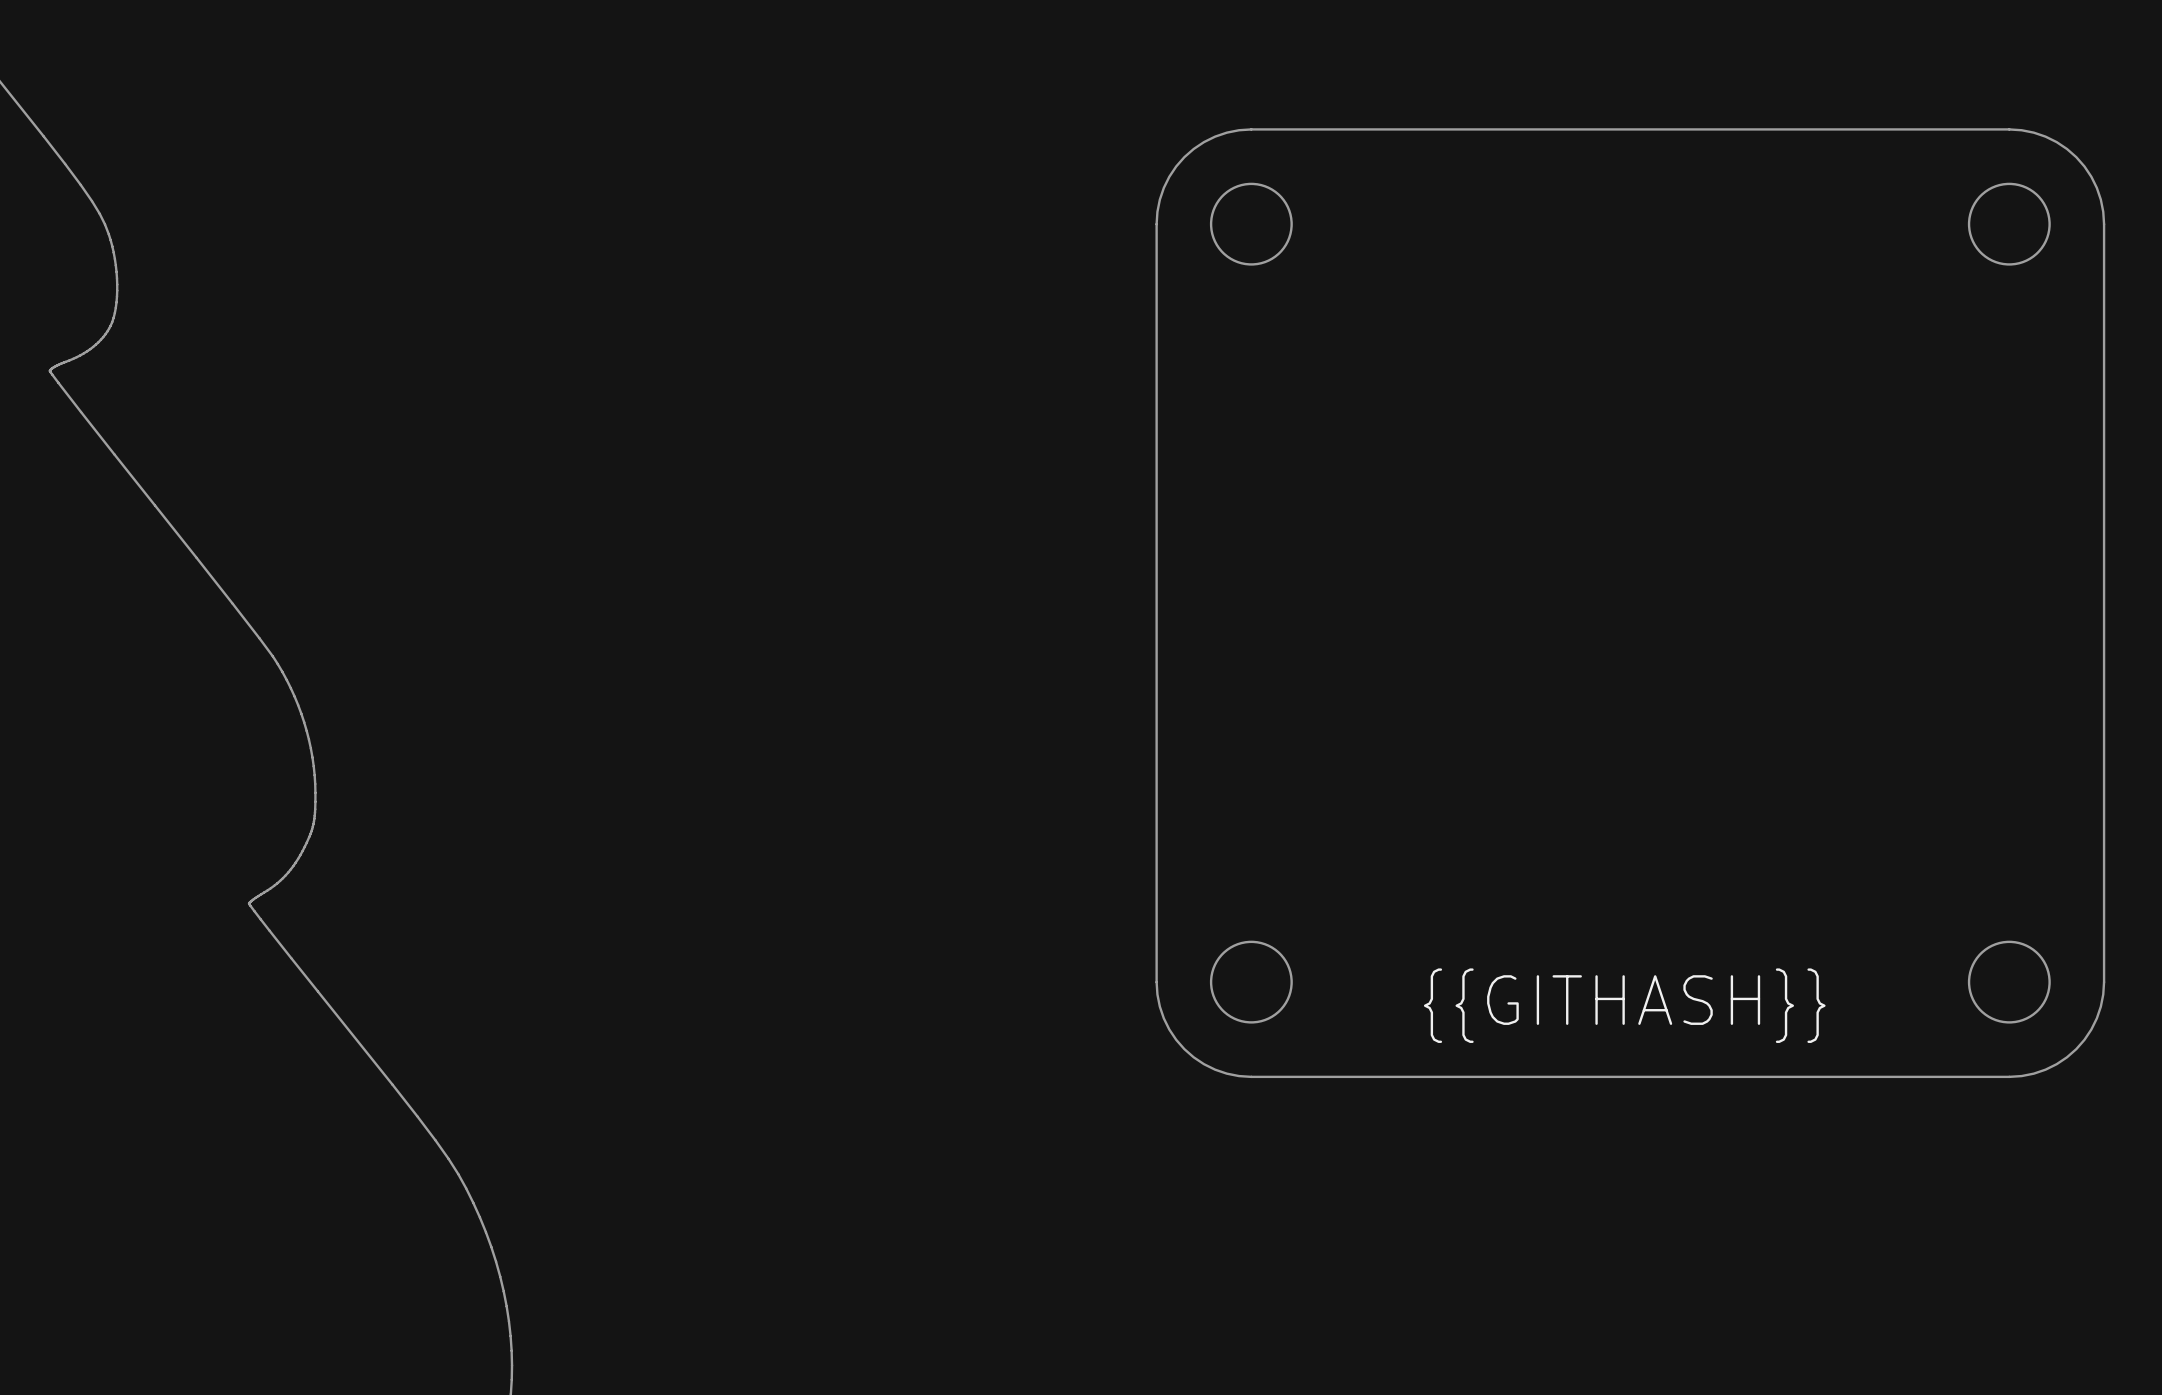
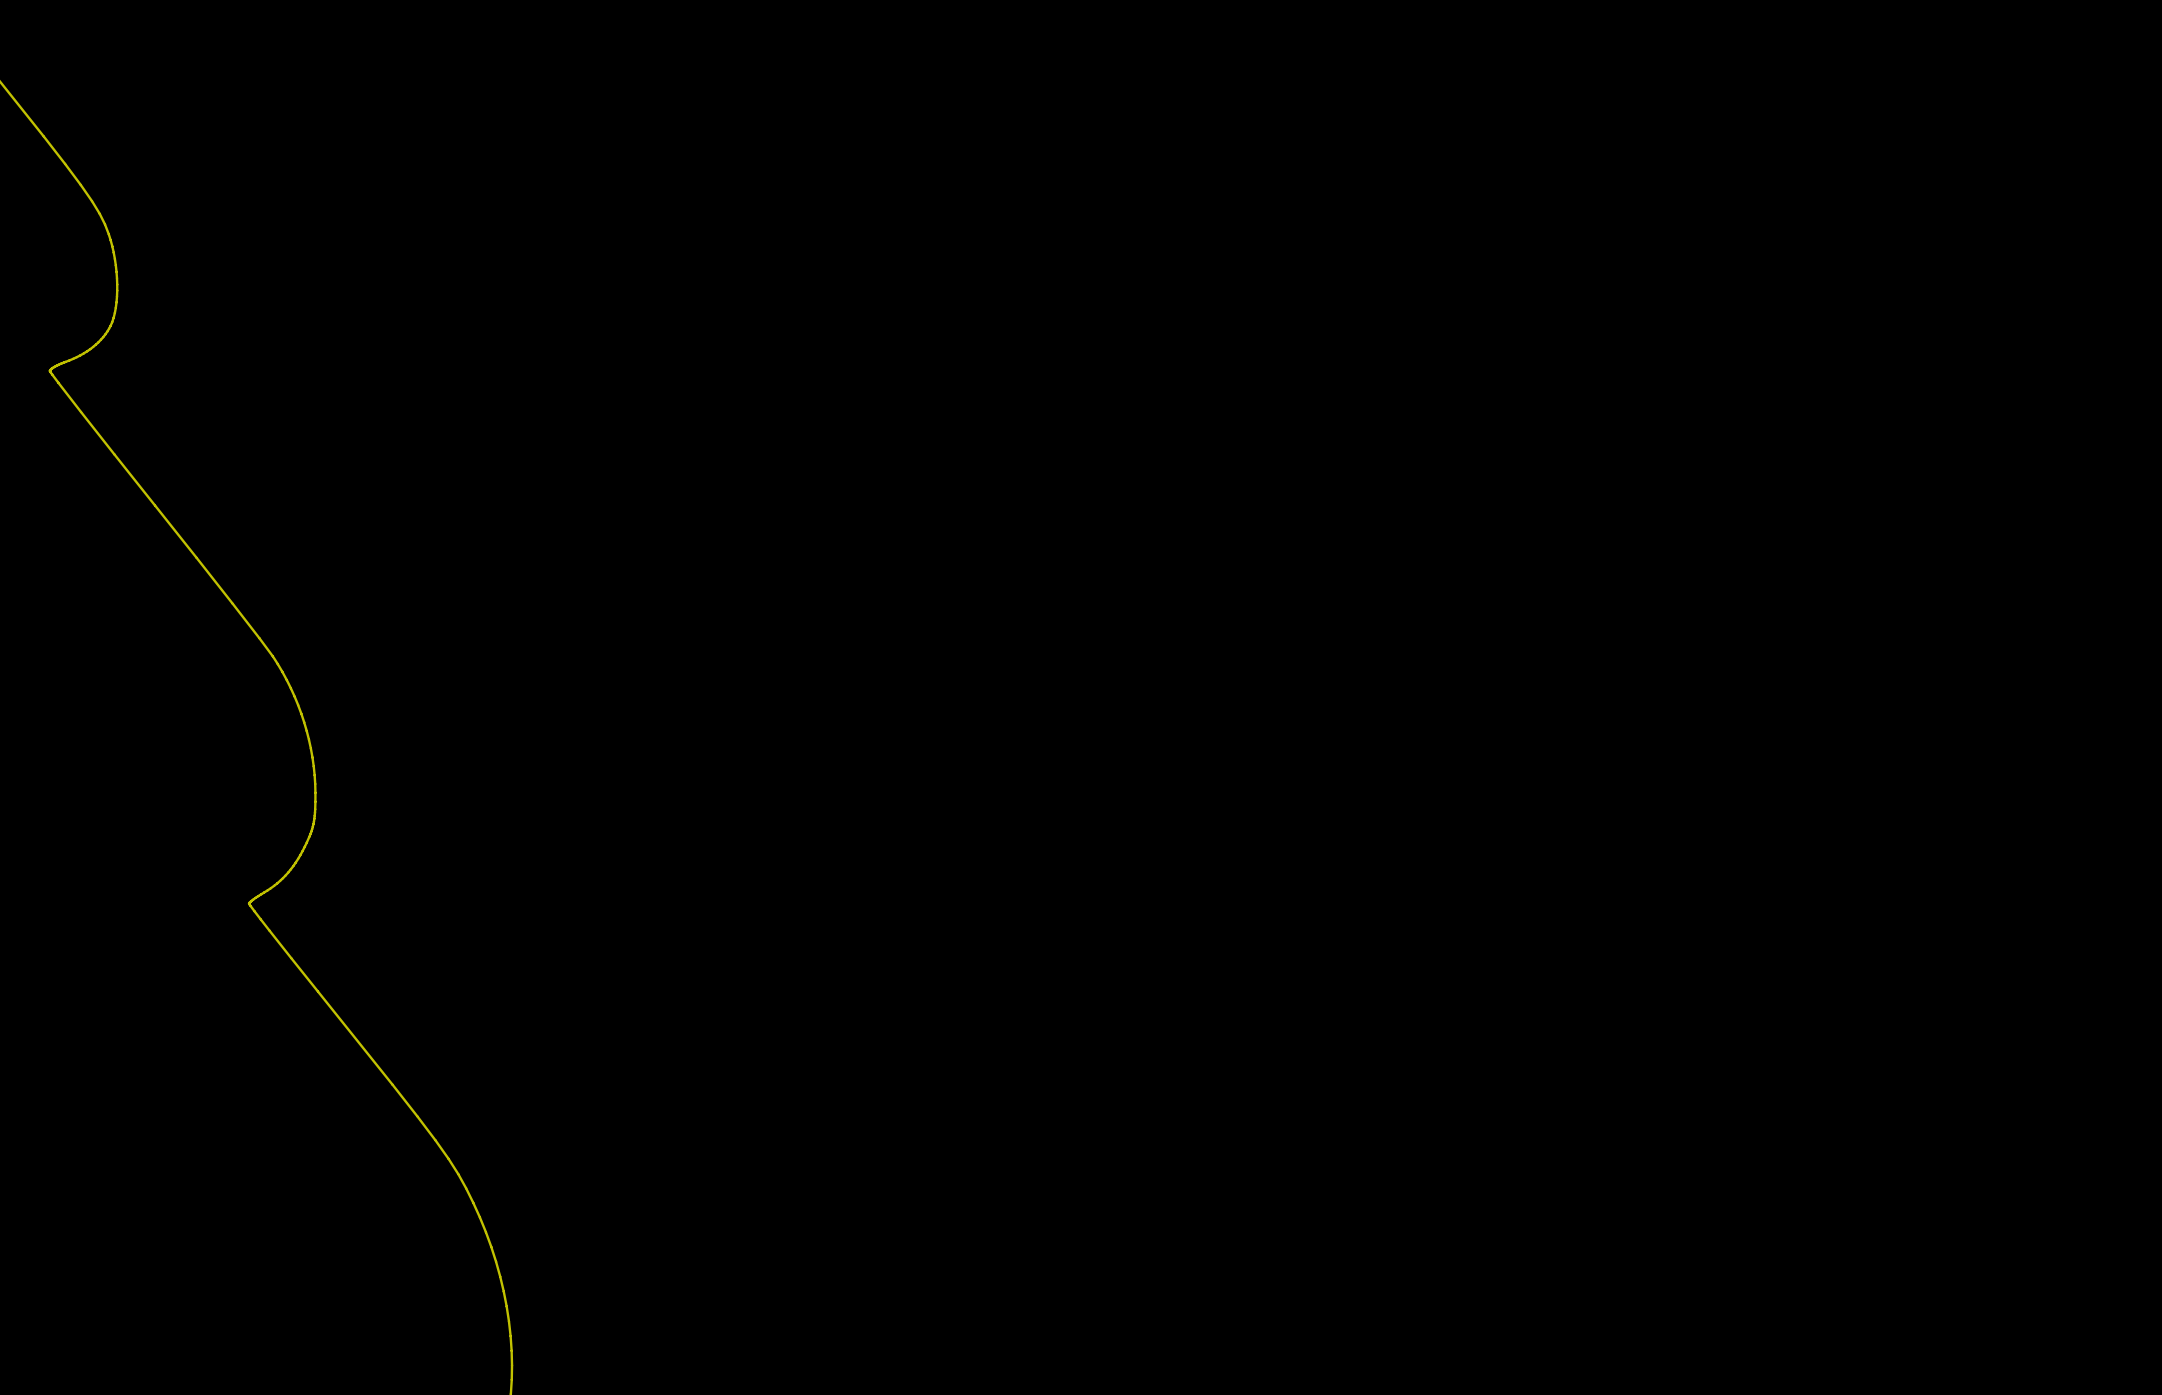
board edge: (1251, 129) (2009, 129) (2033, 132) (2045, 136) (2067, 149) (2076, 157) (2084, 166) (2096, 187) (2100, 199) (2104, 224) (2104, 982) (2103, 994) (2096, 1018) (2084, 1039) (2076, 1049) (2067, 1057) (2045, 1069) (2033, 1073) (2009, 1076) (1251, 1076) (1239, 1076) (1215, 1069) (1193, 1057) (1184, 1049) (1169, 1029) (1163, 1018) (1157, 994) (1156, 982) (1157, 211) (1163, 187) (1169, 176) (1184, 157) (1193, 149) (1215, 136) (1226, 132) (1251, 129) -> none
round board edge: [1209, 182, 1293, 266] -> none
round board edge: [1967, 182, 2051, 266] -> none
round board edge: [1209, 940, 1293, 1024] -> none
round board edge: [1967, 940, 2051, 1024] -> none
text: {{GITHASH}} (1624, 1005) -> none

